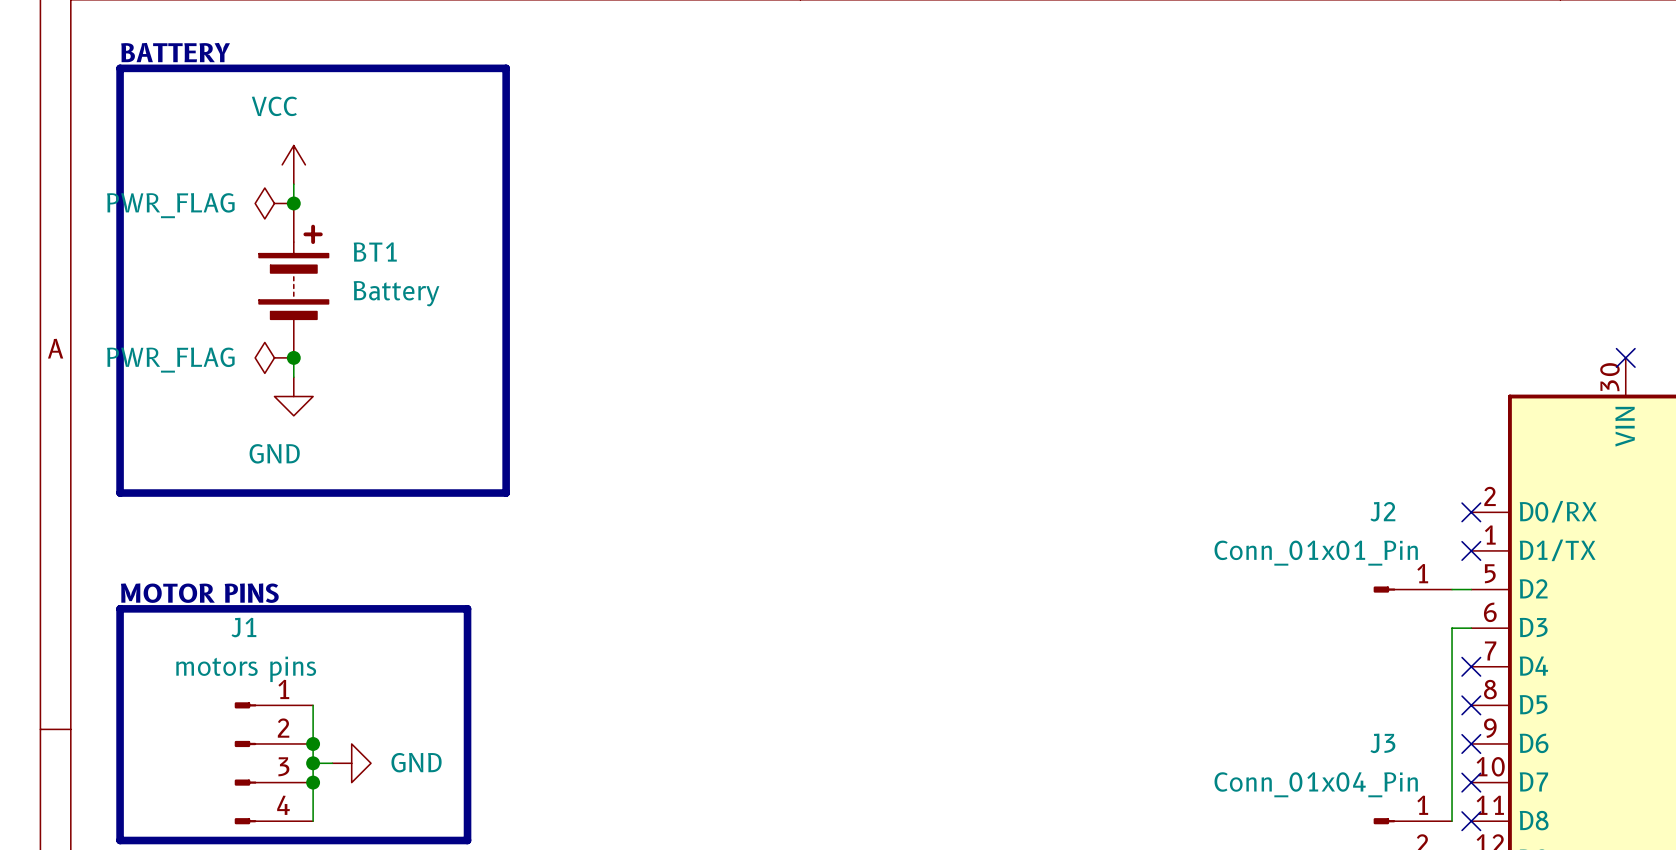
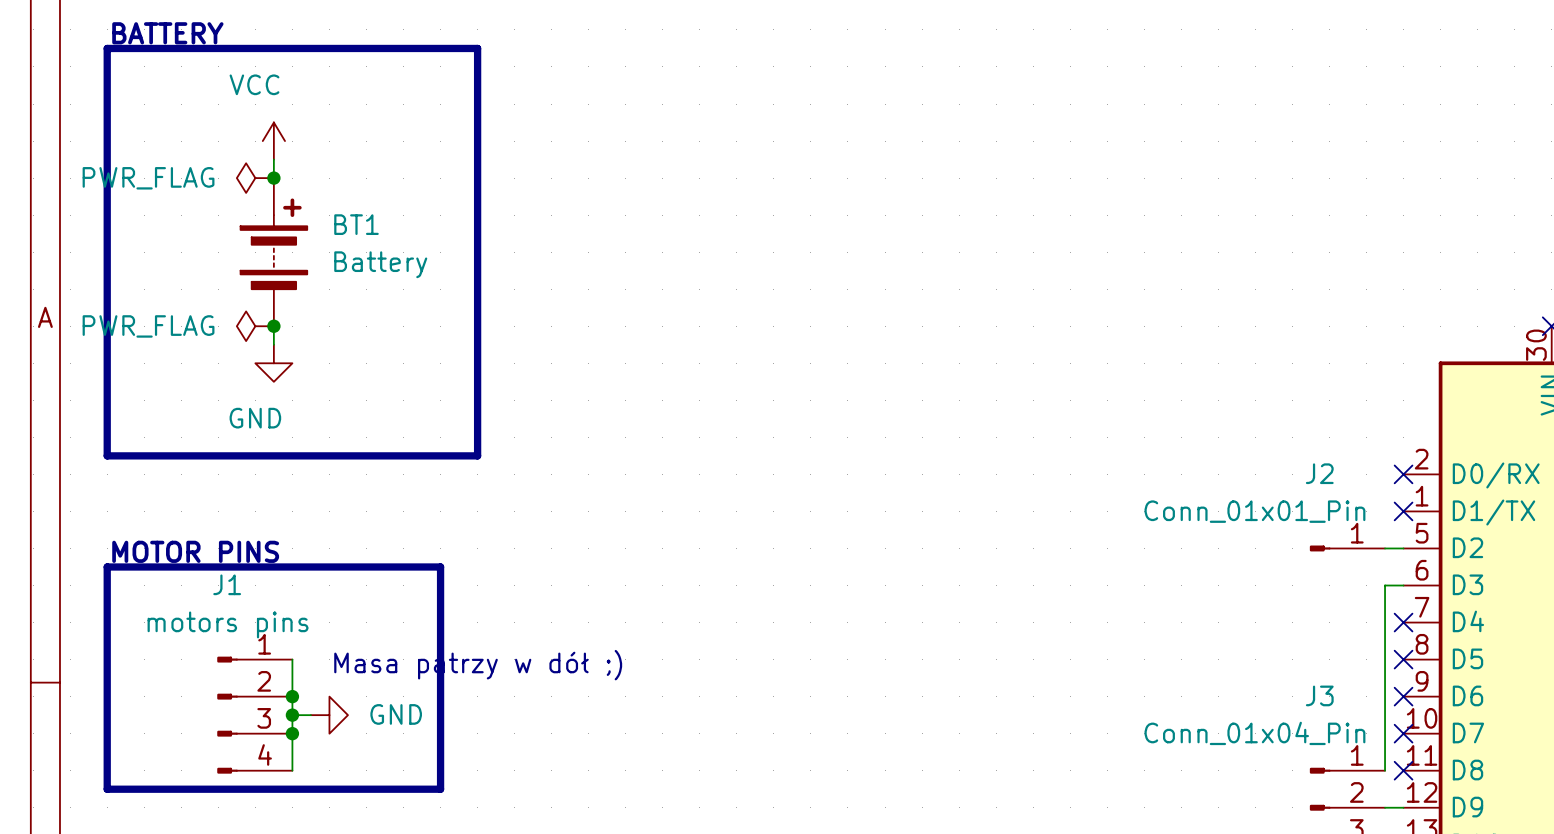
text: none -> Masa patrzy w dół ;) (478, 665)

